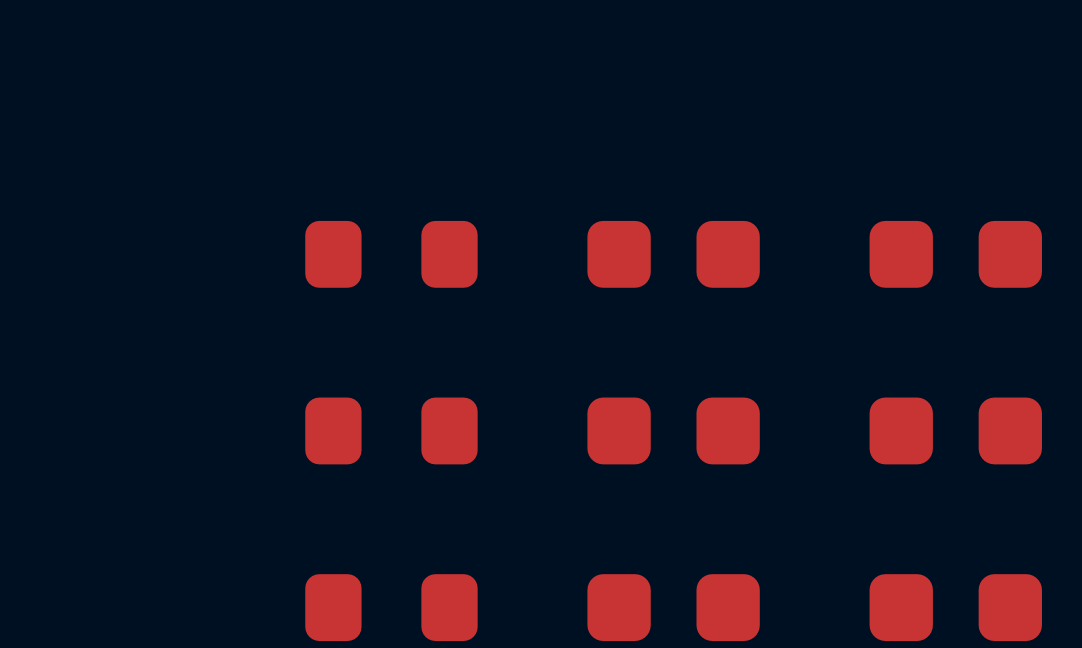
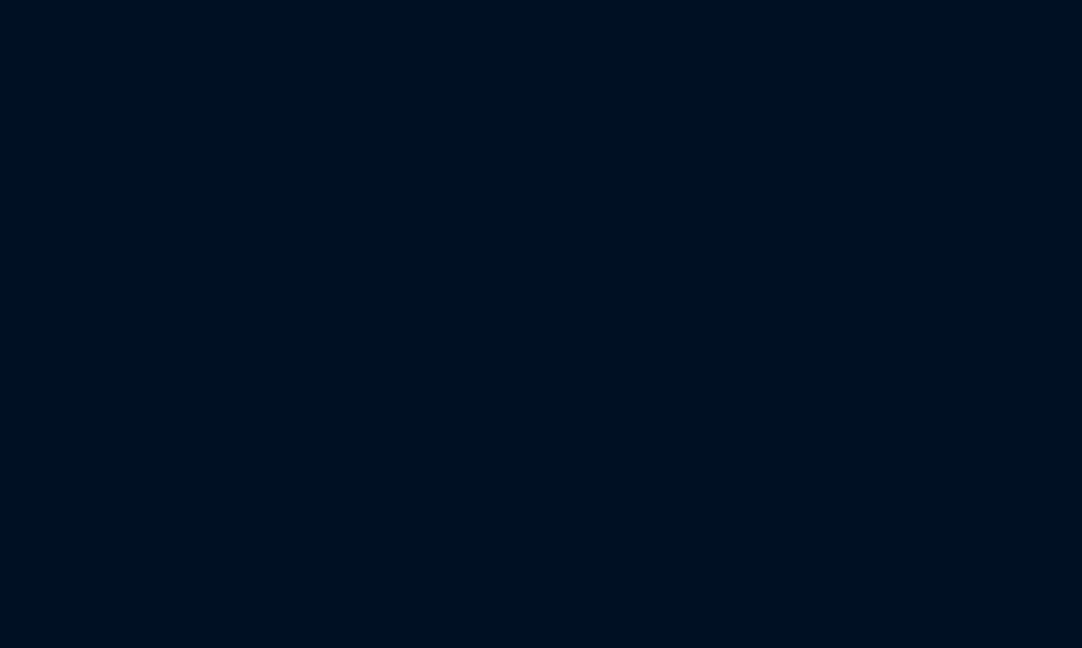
part: (391, 254) -> none
part: (673, 254) -> none
part: (955, 254) -> none
part: (391, 430) -> none
part: (673, 430) -> none
part: (955, 430) -> none
part: (391, 607) -> none
part: (673, 607) -> none
part: (955, 607) -> none

